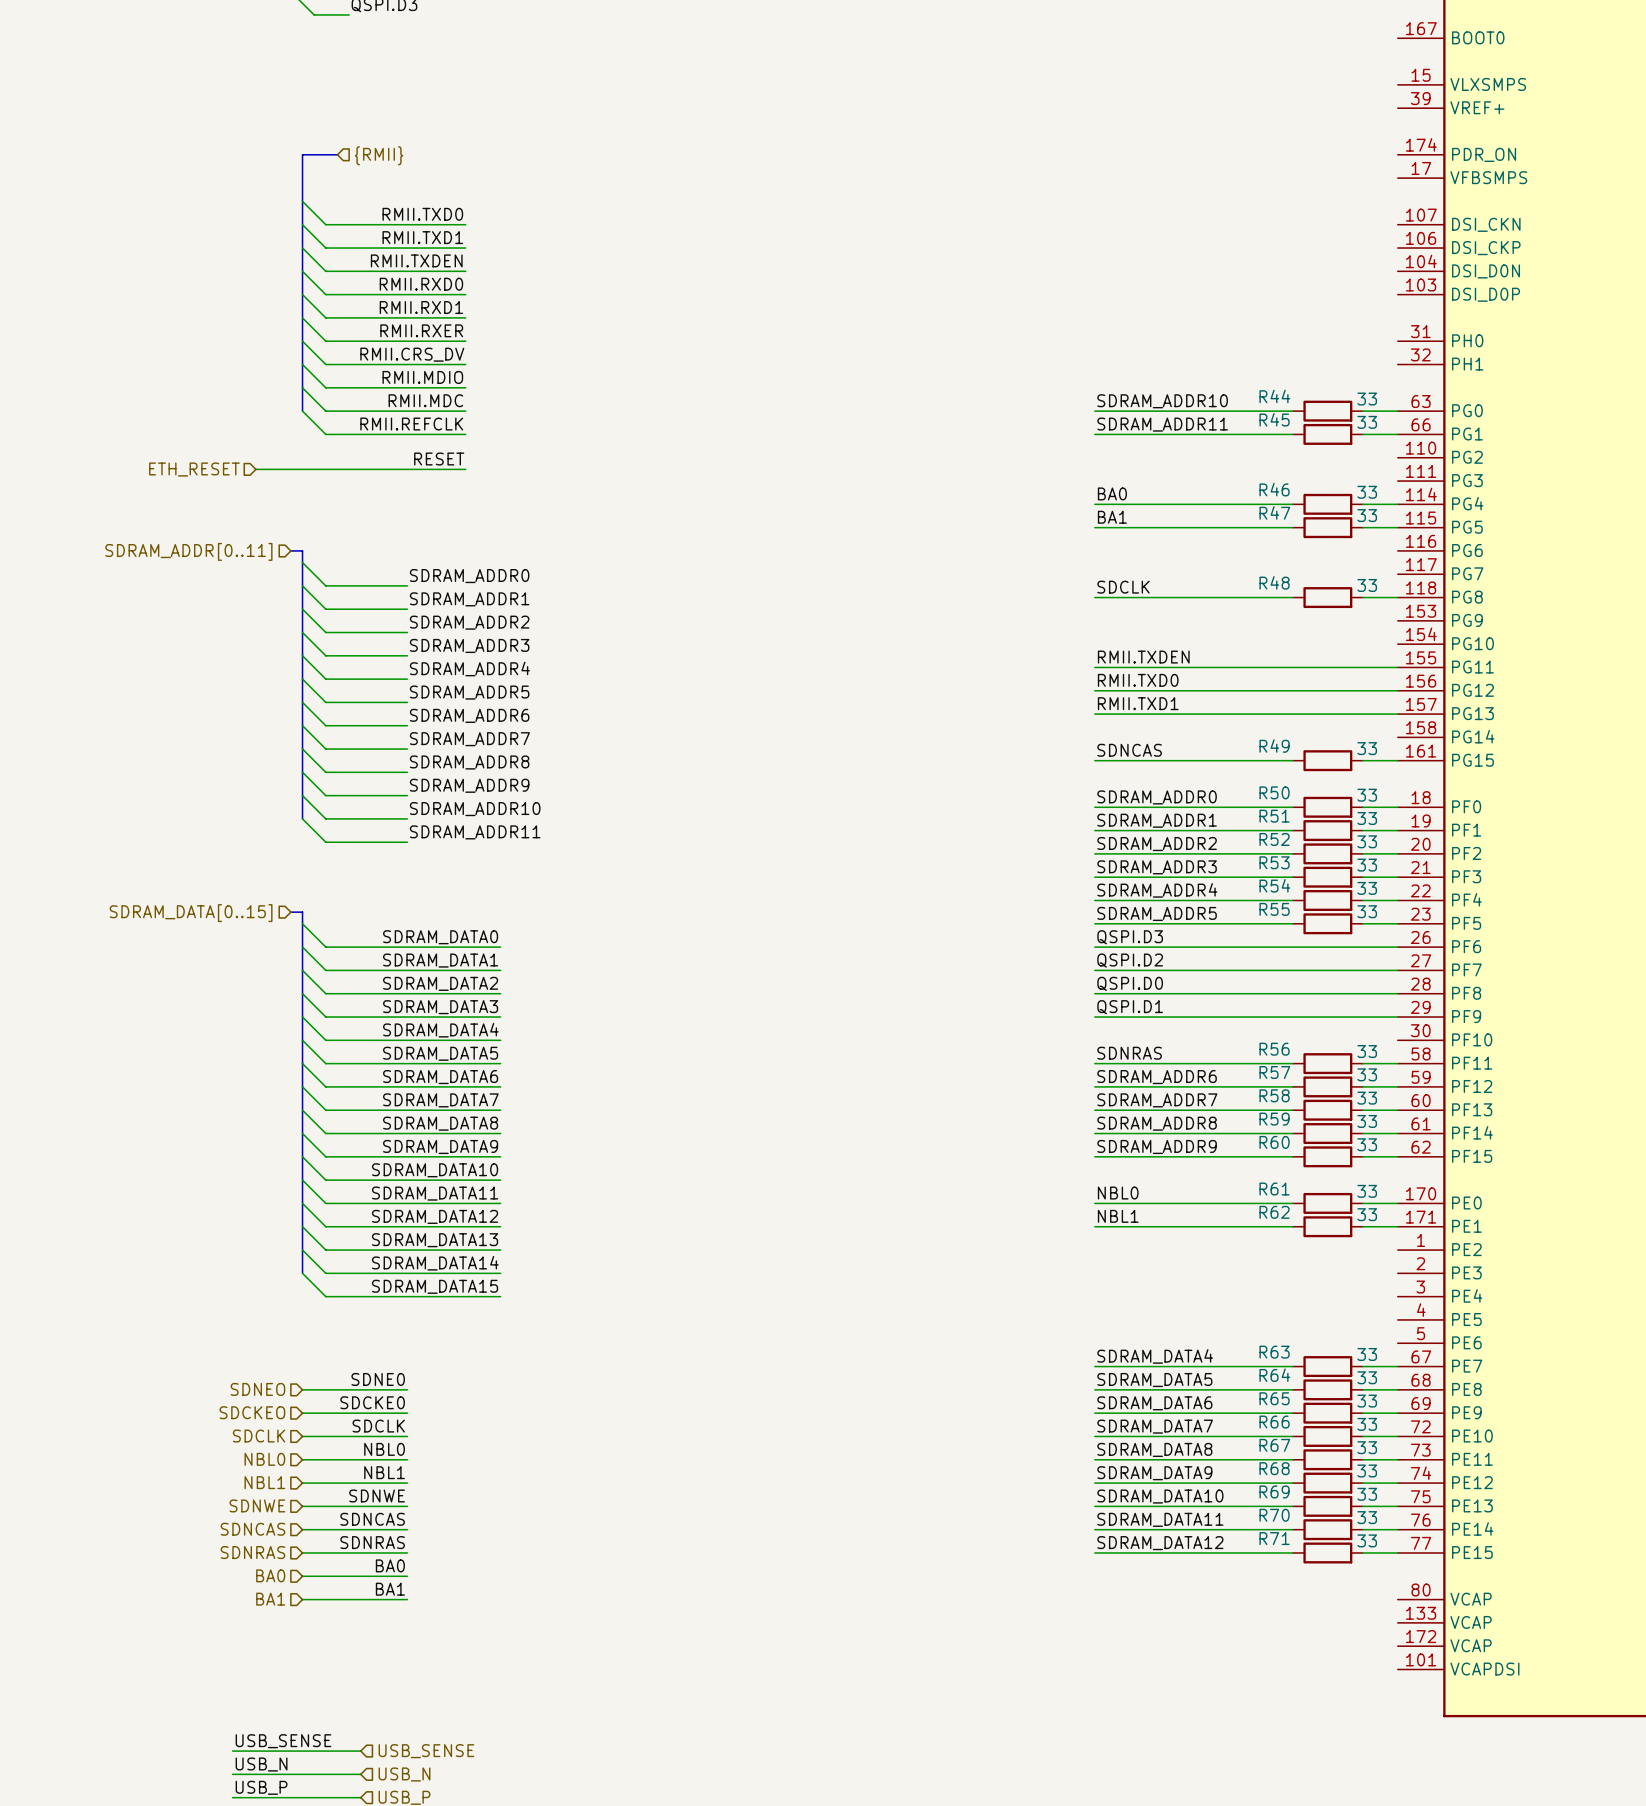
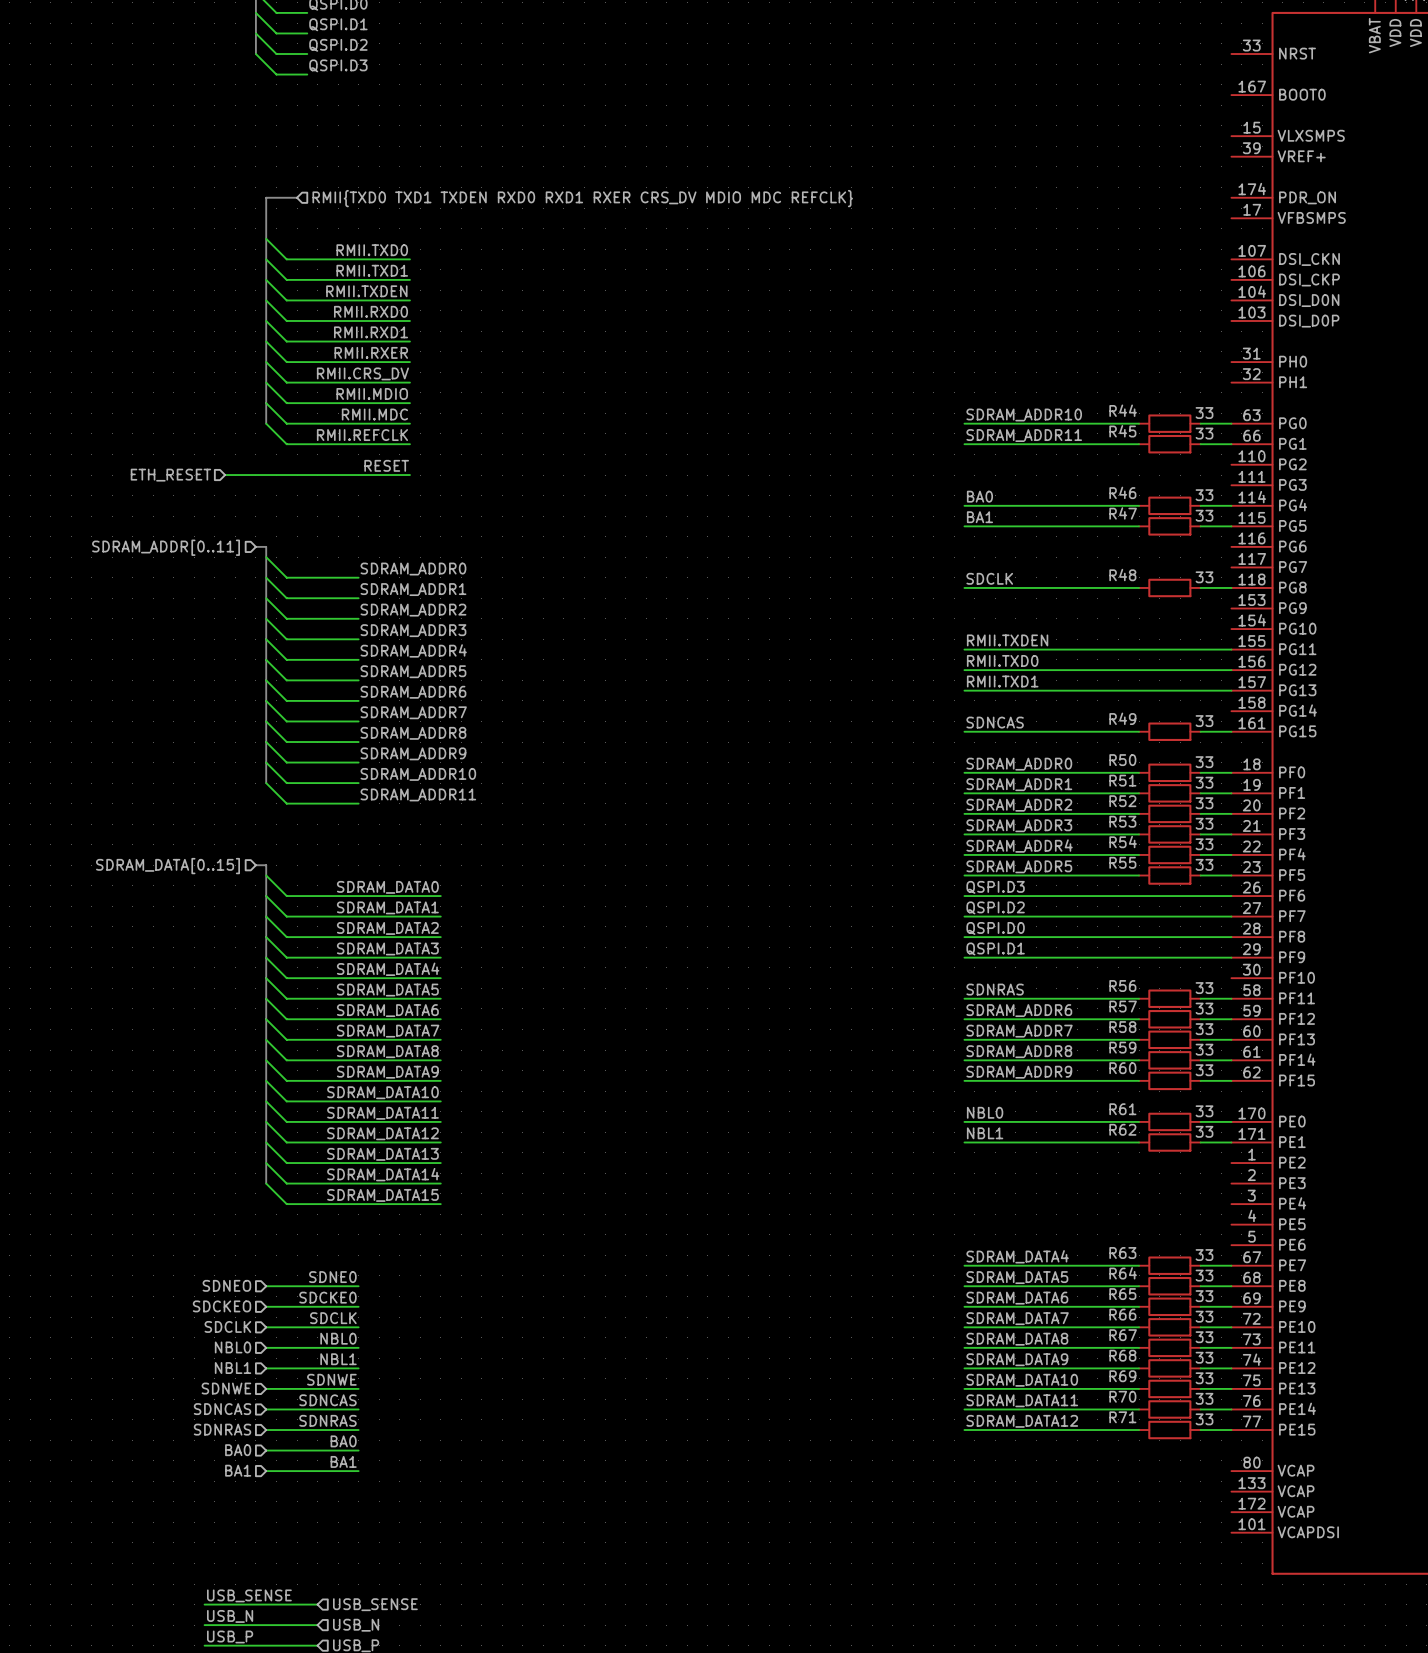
hierarchical label: {RMII} (379, 155) -> RMII{TXD0 TXD1 TXDEN RXD0 RXD1 RXER CRS_DV MDIO MDC REFCLK} (582, 198)

